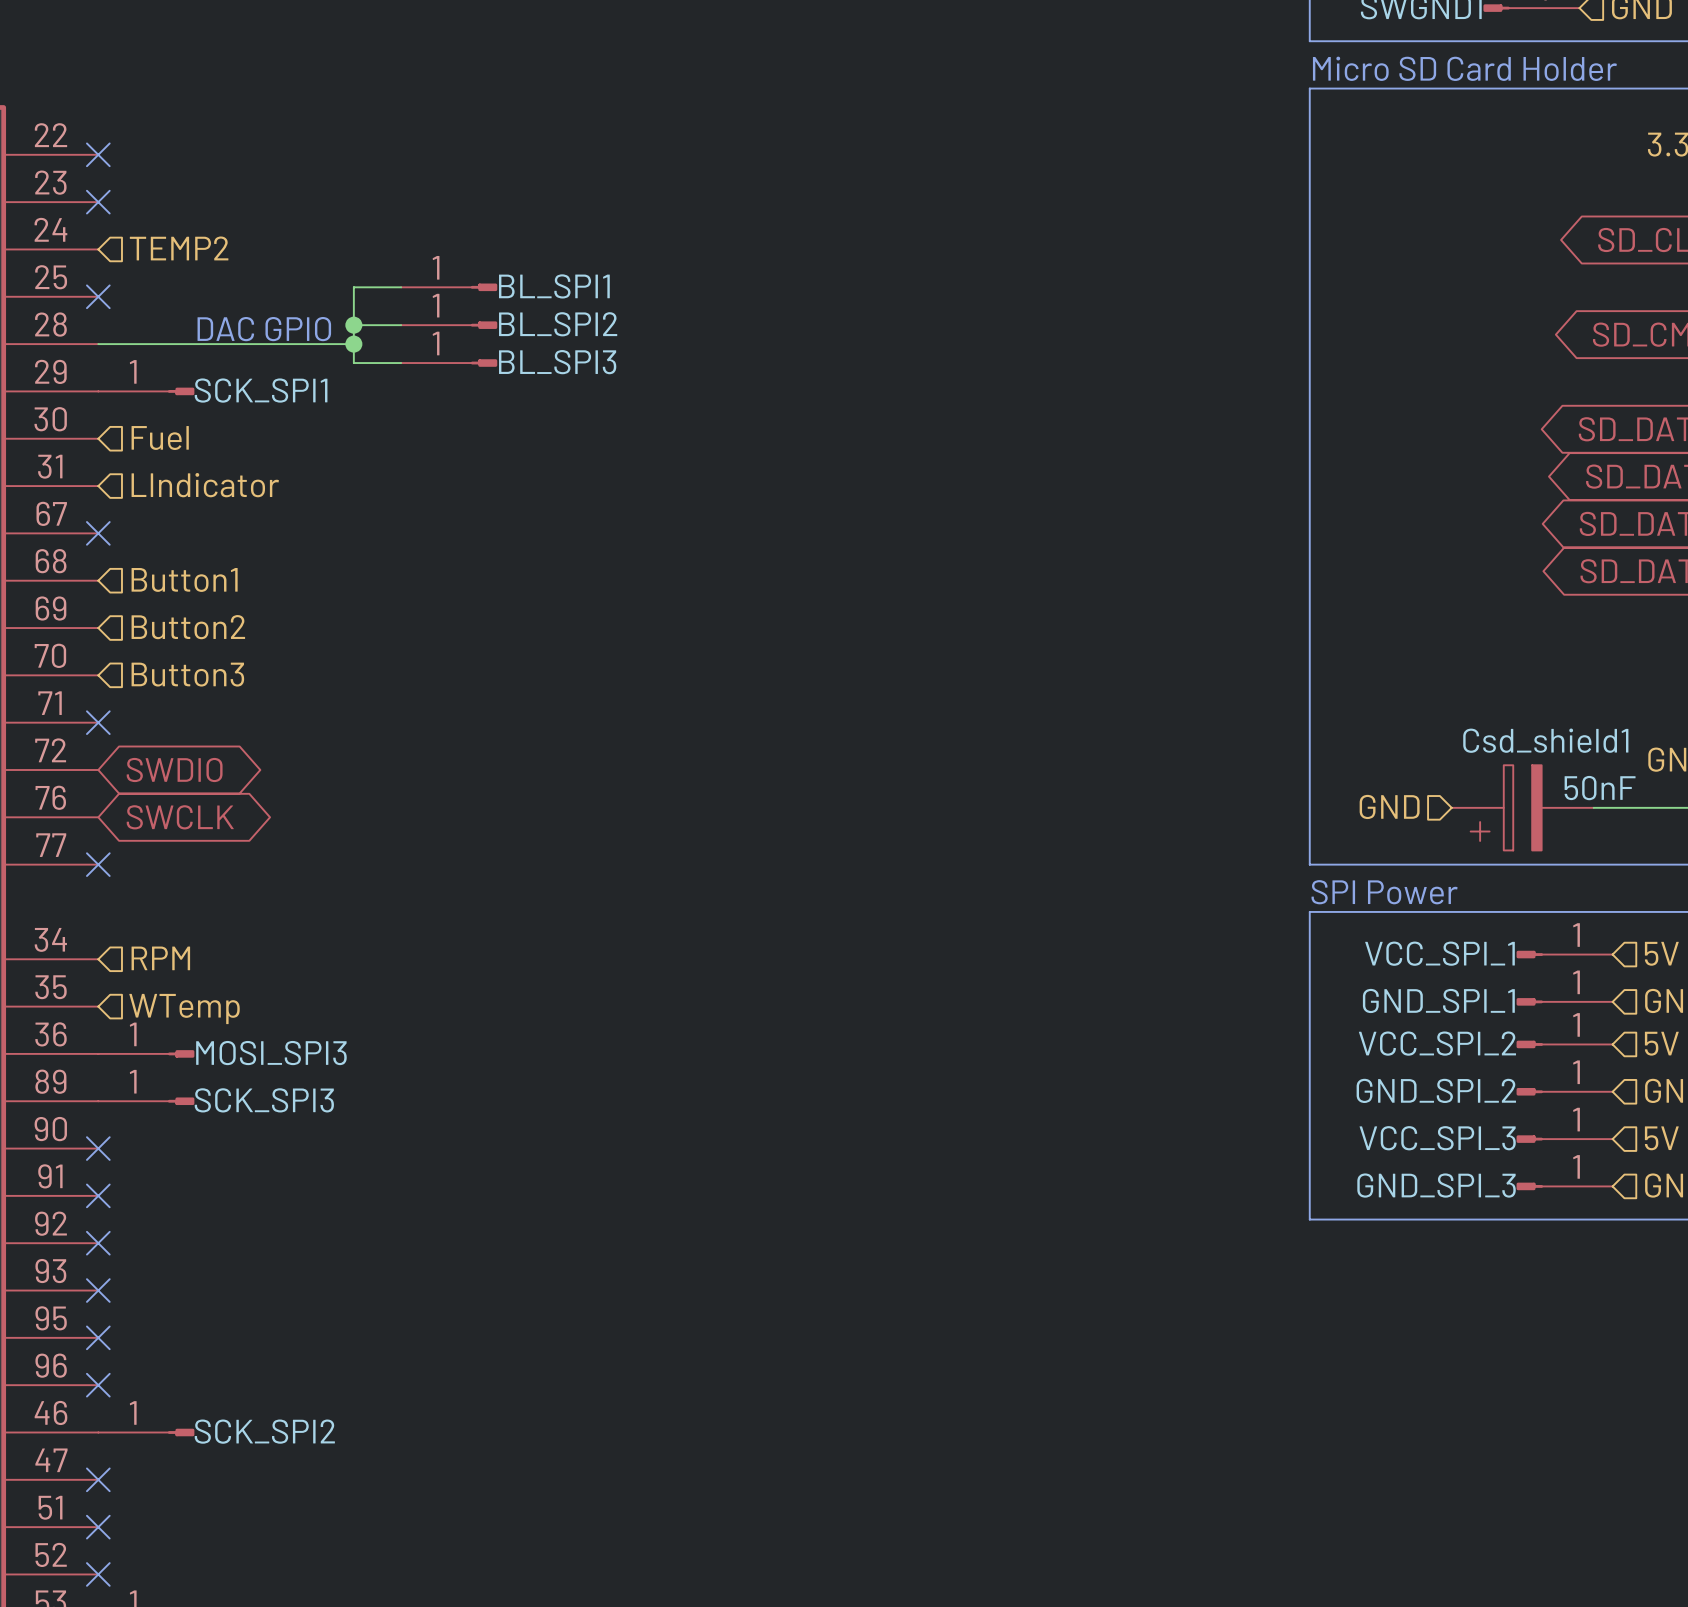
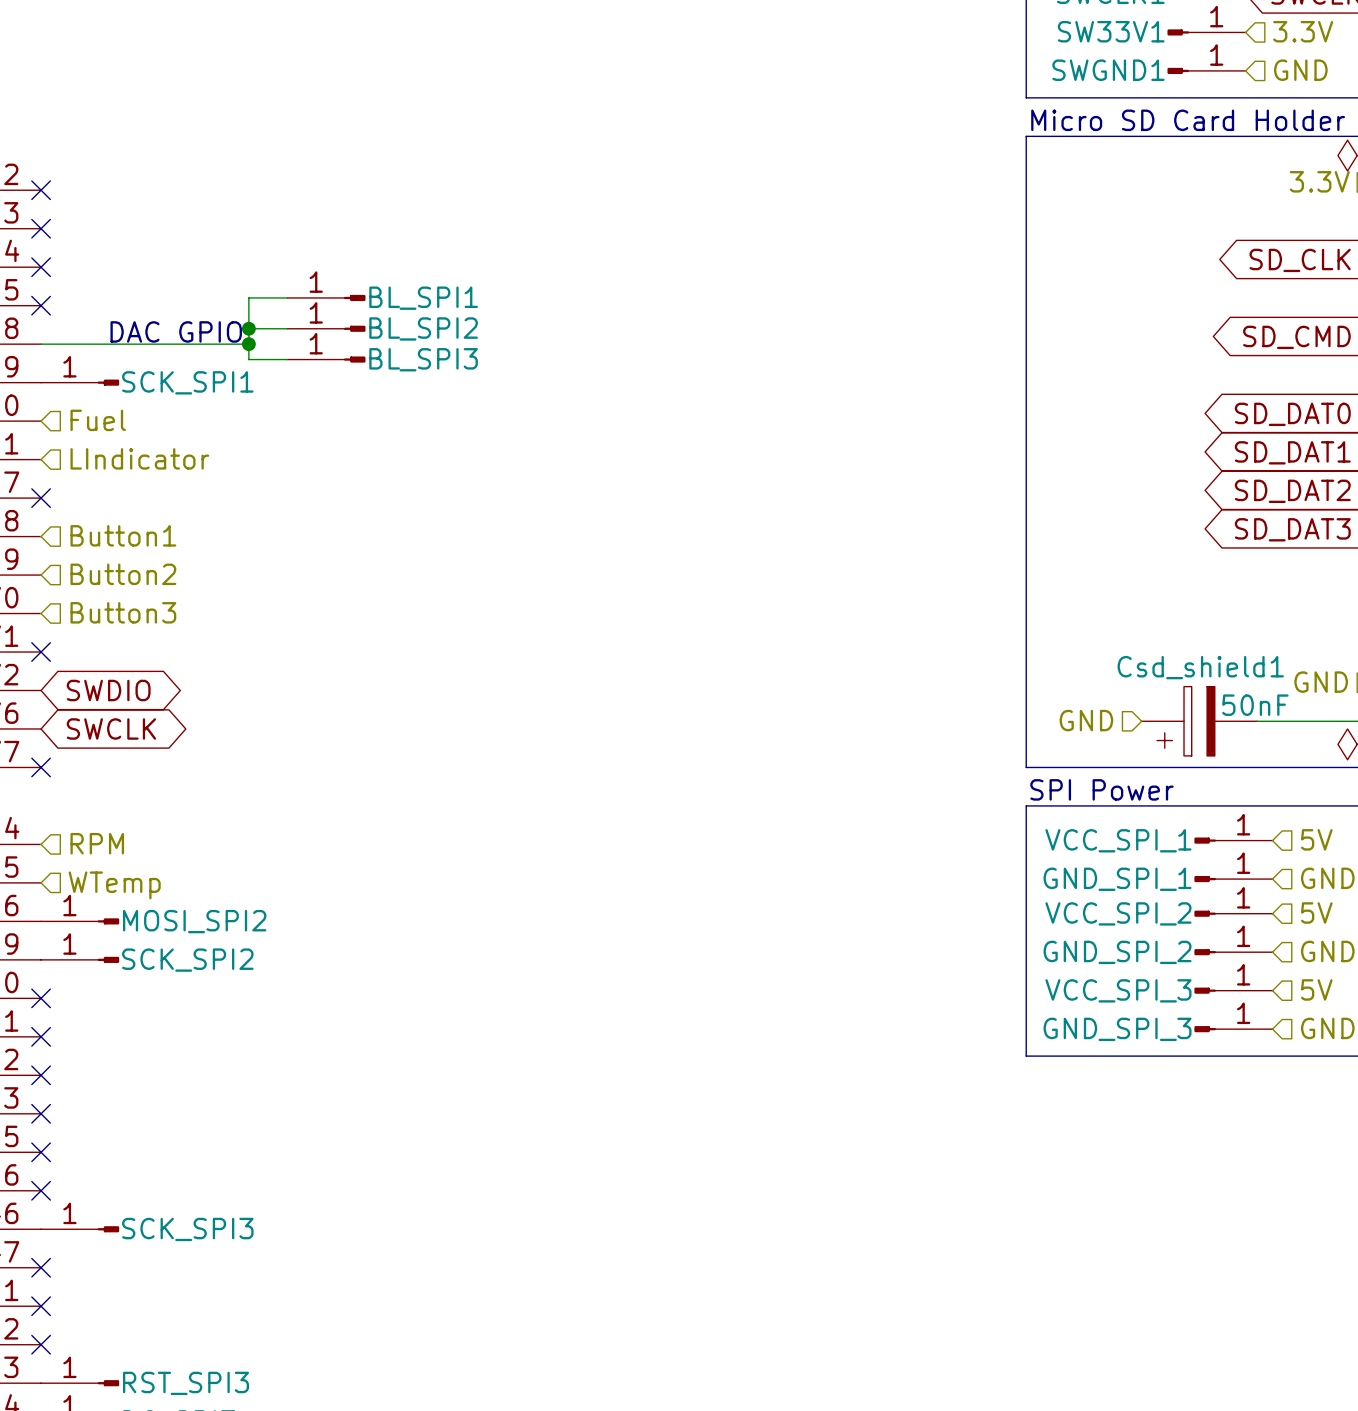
hierarchical label: TEMP2 (179, 248) -> none
no-connect mark: none -> (41, 267)
MOSI_SPI3 name: MOSI_SPI3 (271, 1053) -> MOSI_SPI2 (194, 921)
SCK_SPI3 name: SCK_SPI3 (264, 1100) -> SCK_SPI2 (187, 960)
SCK_SPI2 name: SCK_SPI2 (264, 1431) -> SCK_SPI3 (187, 1229)

